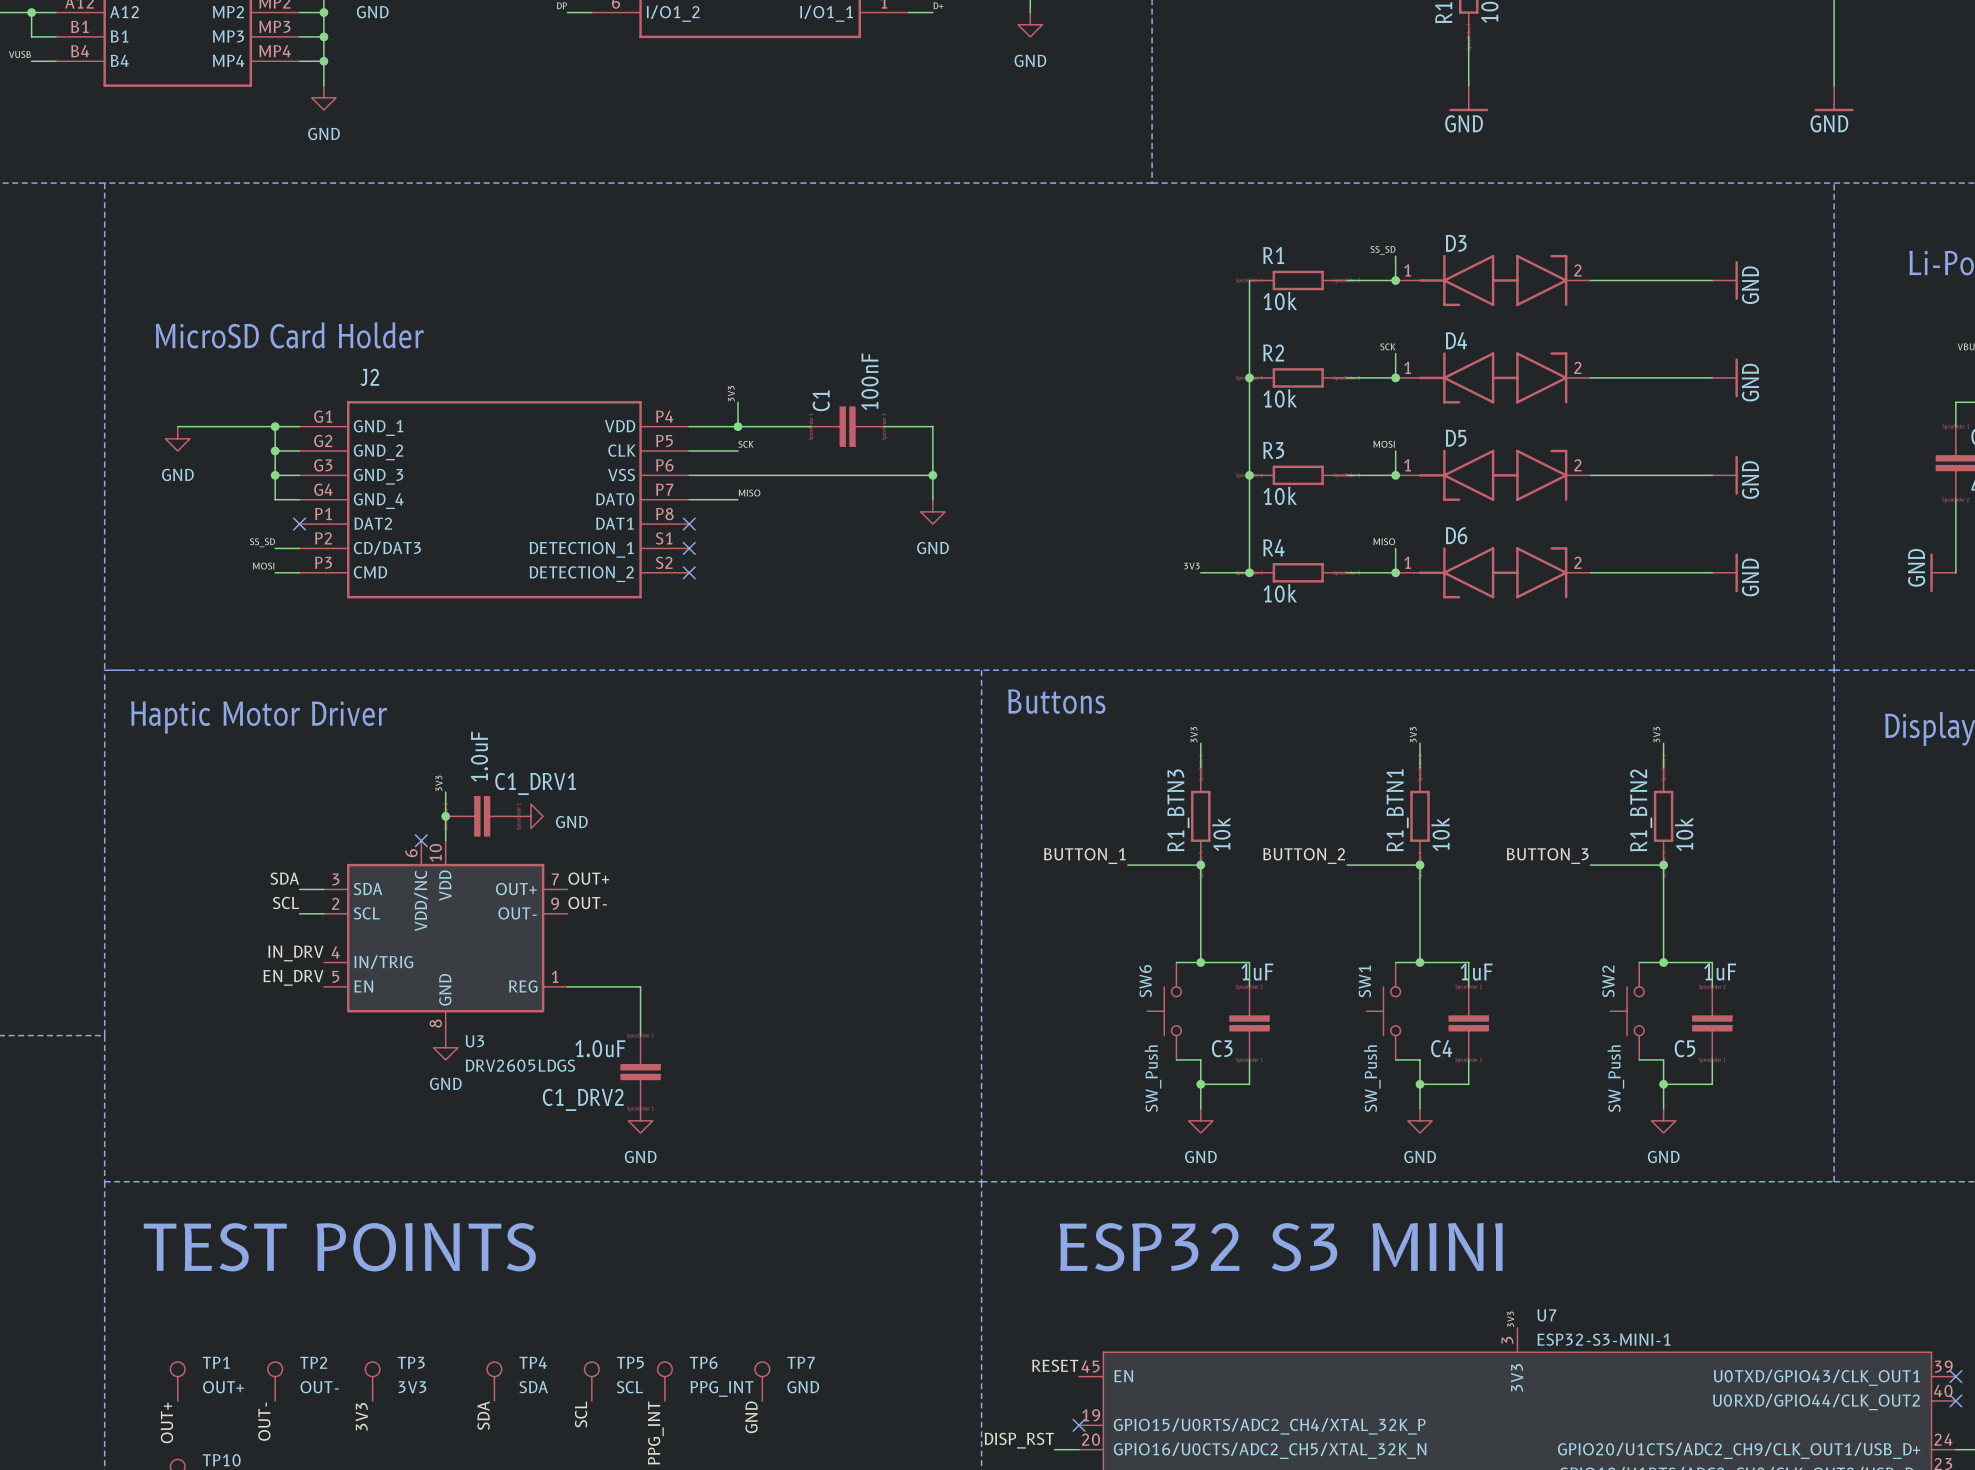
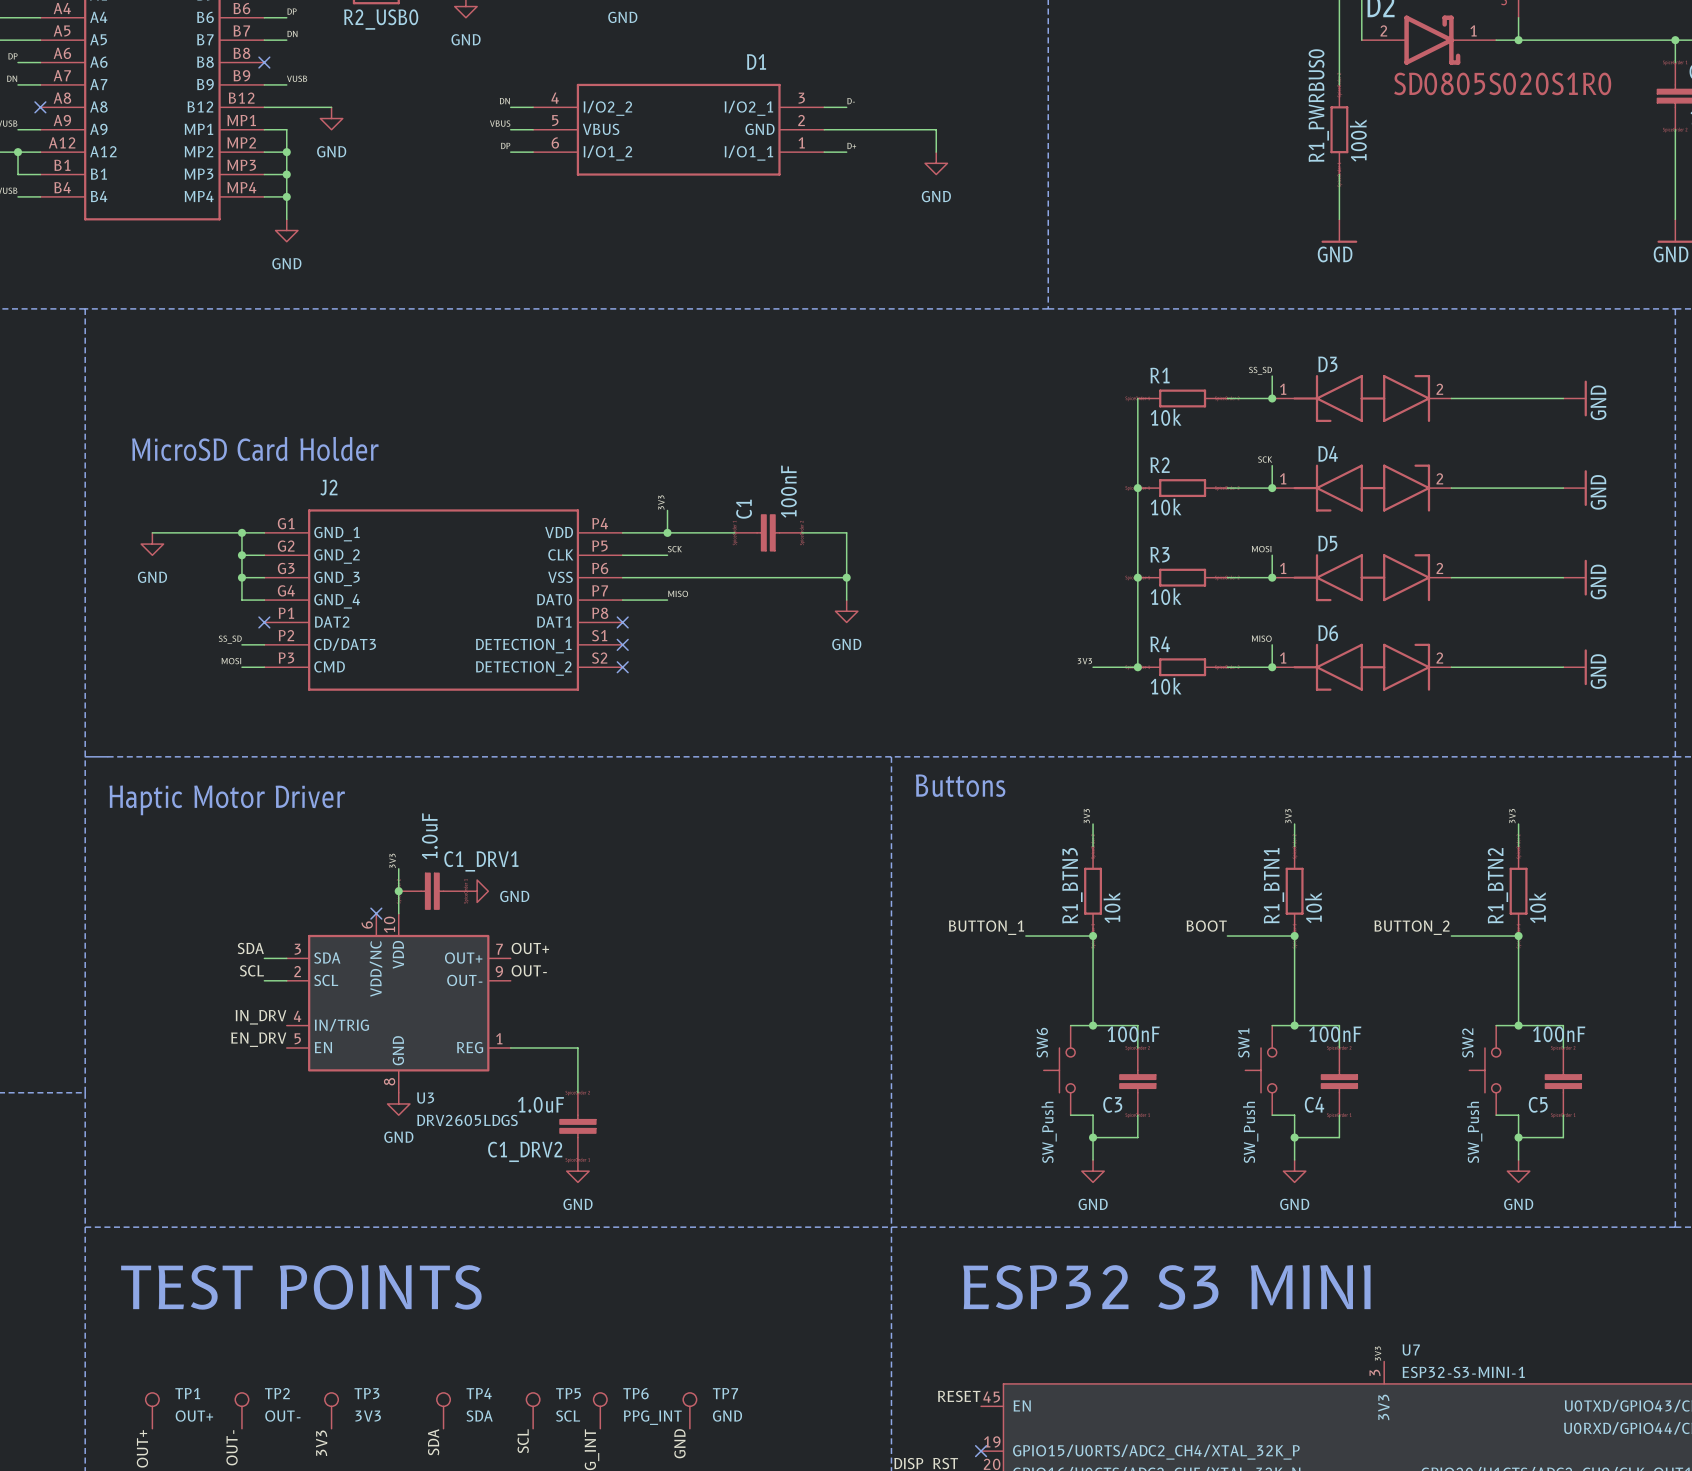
label: BUTTON_2 (1304, 856) -> BOOT (1206, 926)
label: BUTTON_3 (1547, 856) -> BUTTON_2 (1412, 927)
C3 value: 1uF (1257, 971) -> 100nF (1133, 1034)
C4 value: 1uF (1476, 971) -> 100nF (1335, 1034)
C5 value: 1uF (1720, 971) -> 100nF (1559, 1034)

